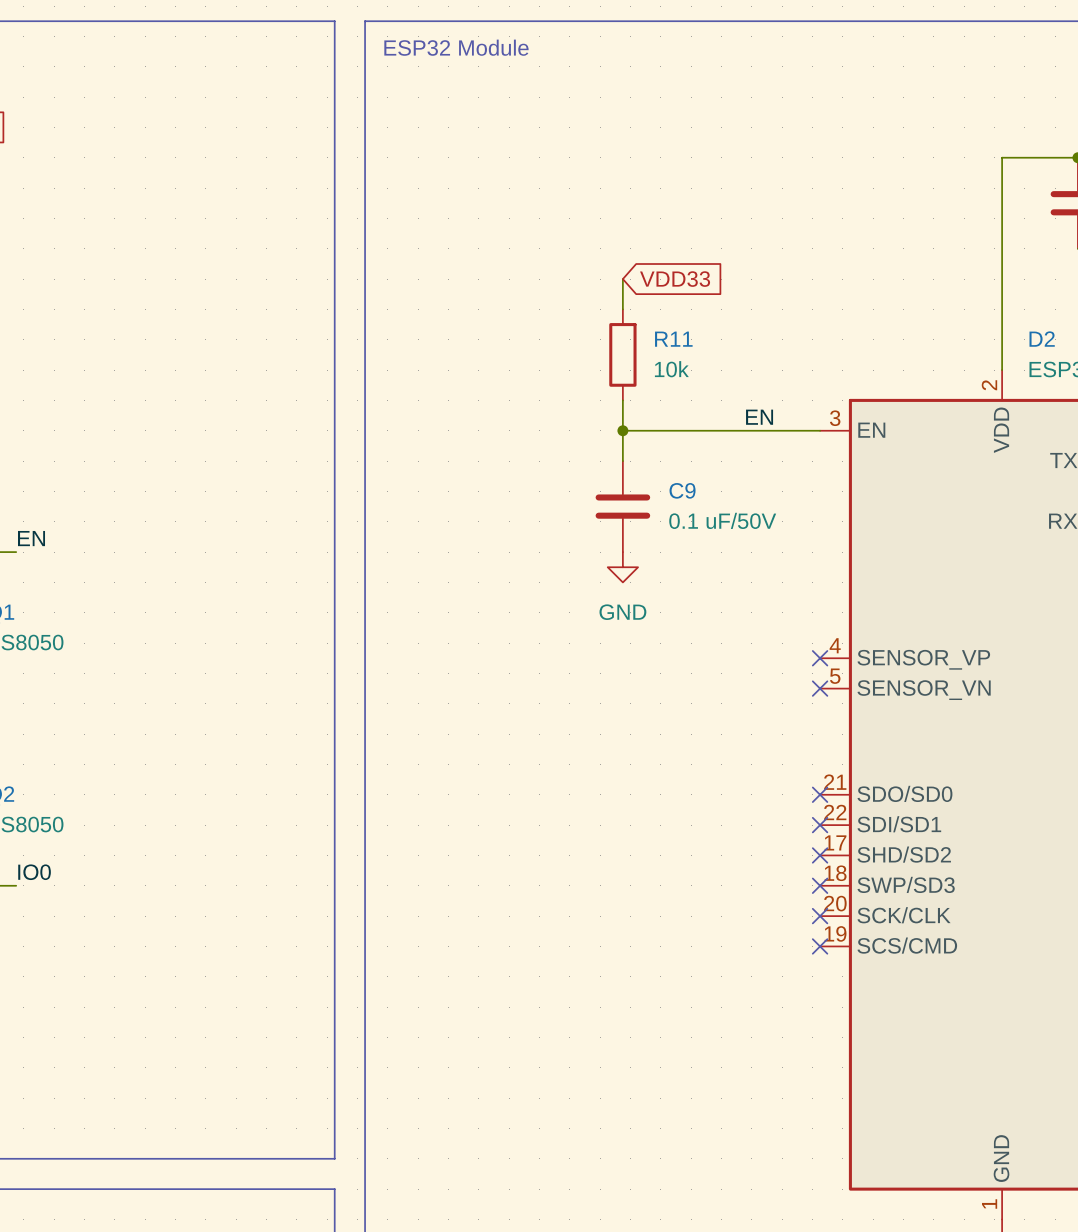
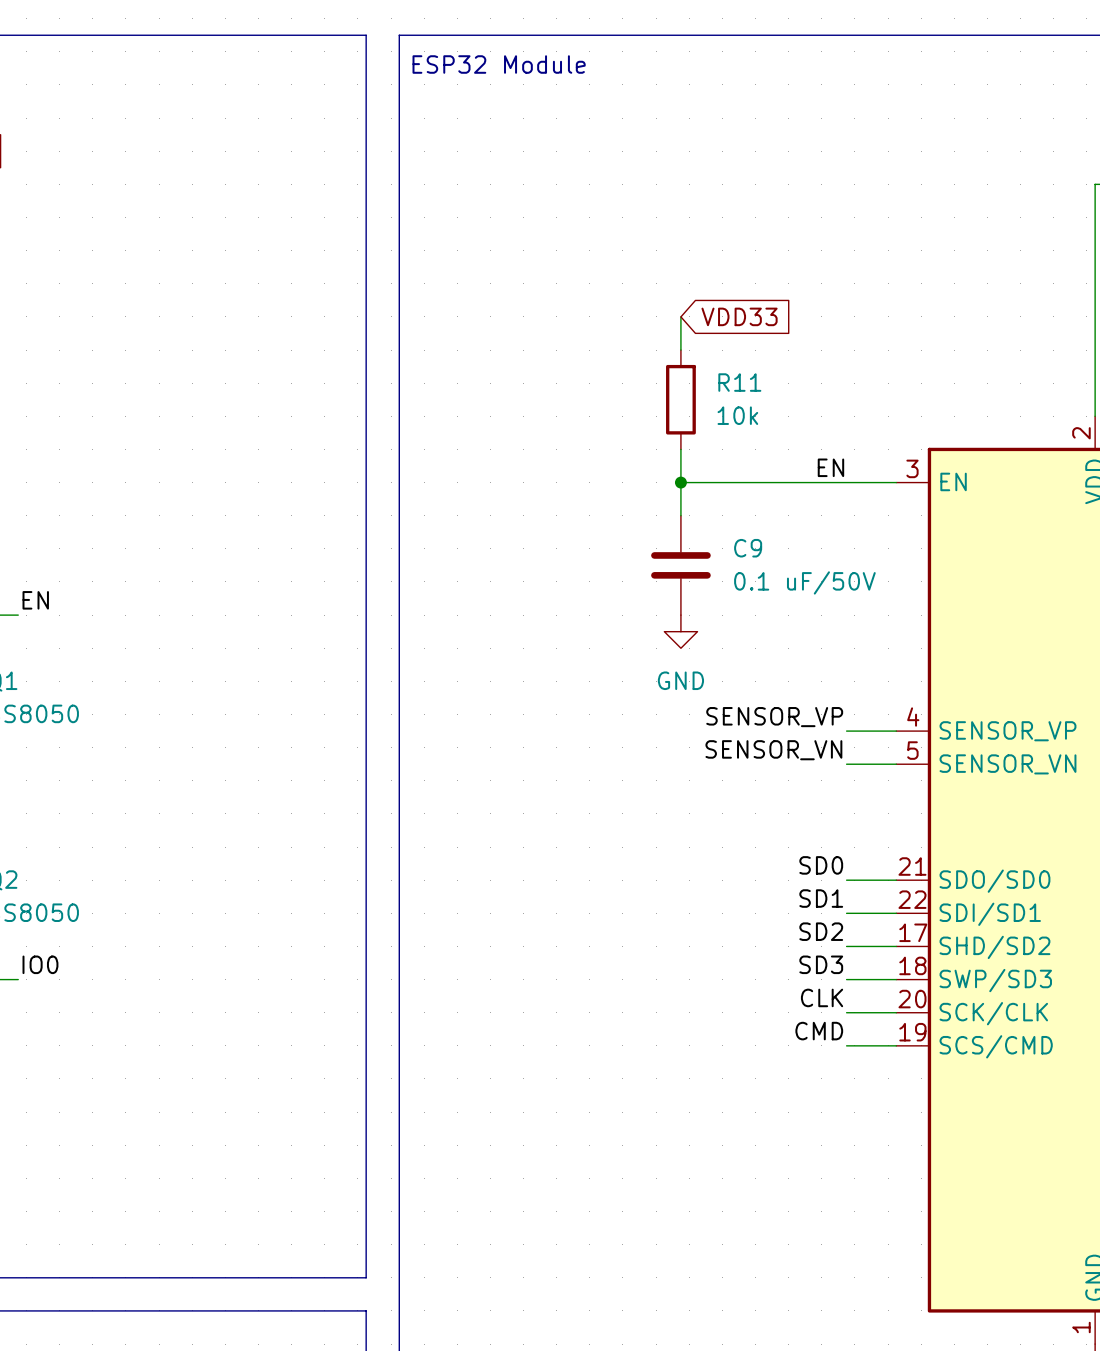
label: none -> SENSOR_VP (774, 717)
wire: none -> (846, 731) (896, 731)
no-connect mark: (820, 658) -> none
label: none -> SENSOR_VN (773, 750)
wire: none -> (846, 764) (896, 764)
no-connect mark: (820, 688) -> none
label: none -> SD0 (821, 865)
wire: none -> (846, 880) (896, 880)
no-connect mark: (820, 794) -> none
label: none -> SD1 (821, 898)
wire: none -> (846, 913) (896, 913)
no-connect mark: (820, 825) -> none
label: none -> SD2 (821, 931)
wire: none -> (846, 946) (896, 946)
no-connect mark: (820, 855) -> none
label: none -> SD3 (821, 964)
wire: none -> (846, 979) (896, 979)
no-connect mark: (820, 885) -> none
label: none -> CLK (822, 997)
wire: none -> (846, 1012) (896, 1012)
no-connect mark: (820, 916) -> none
label: none -> CMD (819, 1031)
wire: none -> (846, 1045) (896, 1045)
no-connect mark: (820, 946) -> none

